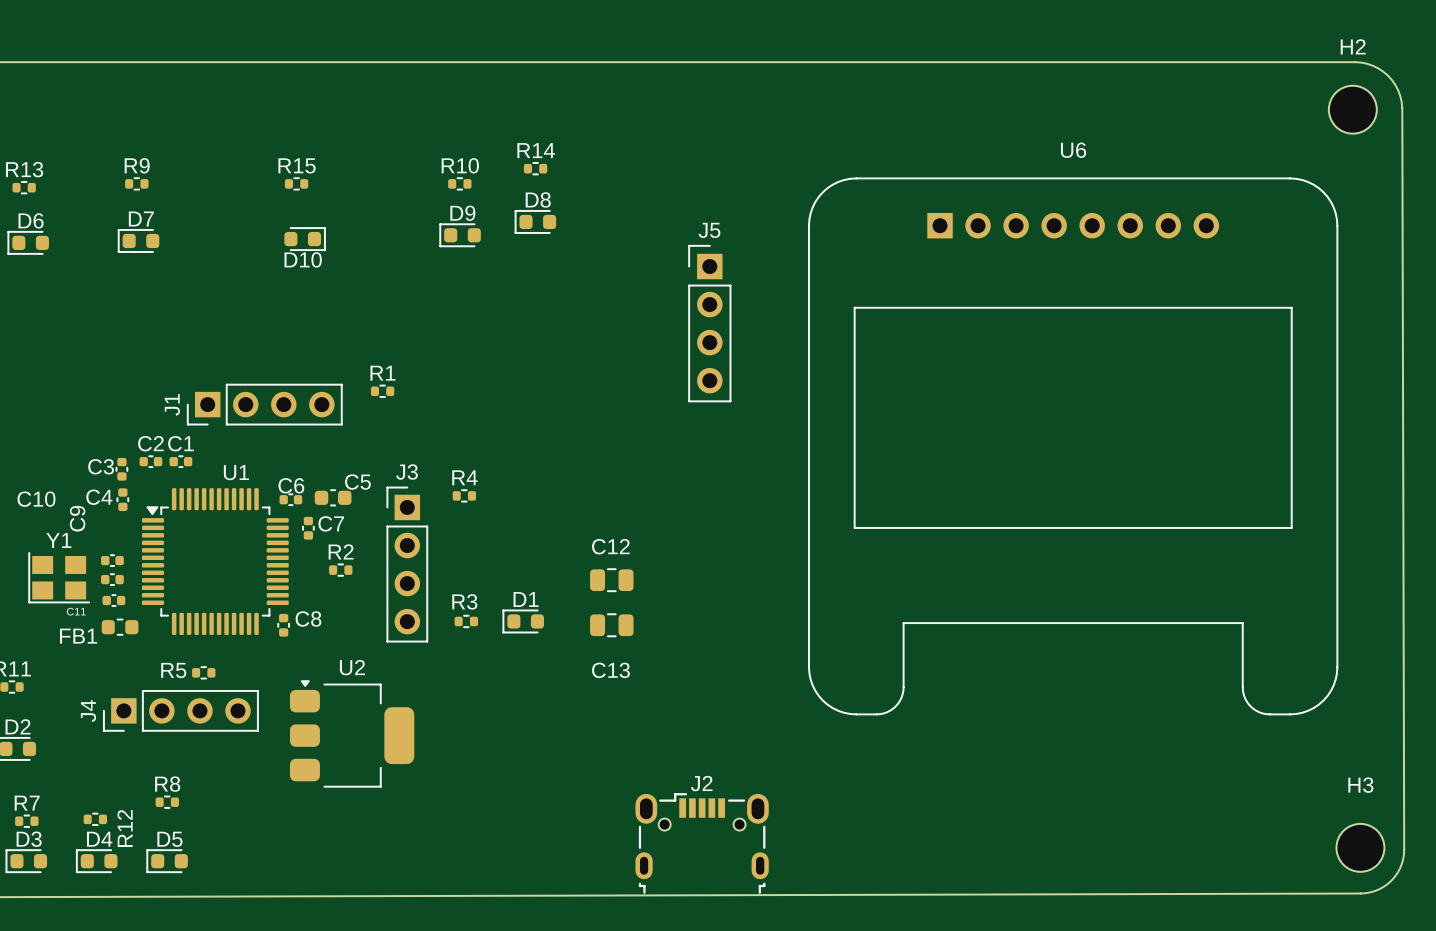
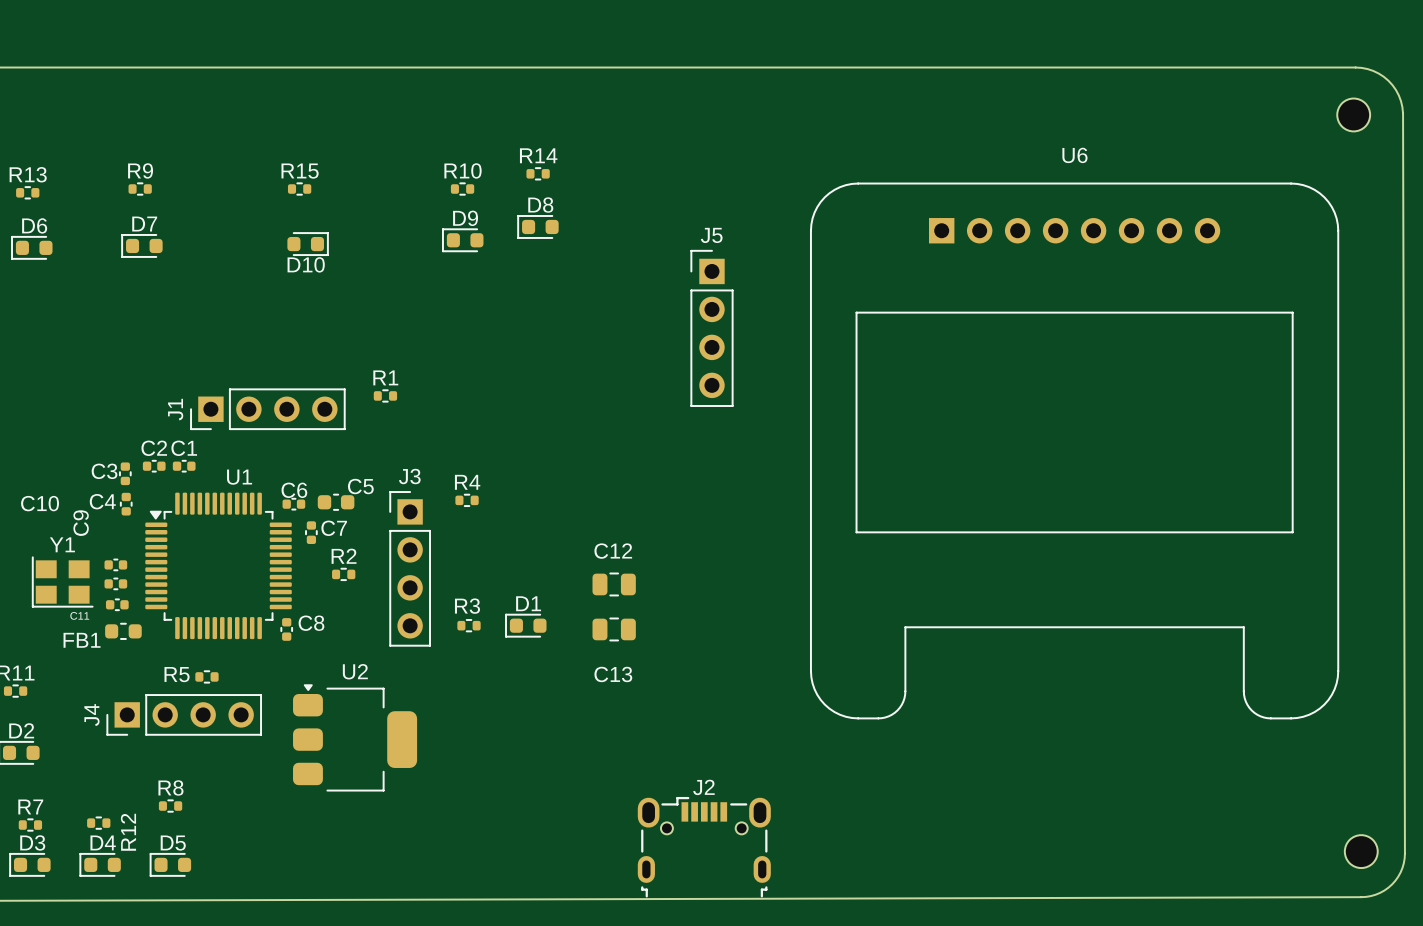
H2: (1352, 109) -> none
part: none -> (1353, 114)
H3: (1360, 847) -> none
part: none -> (1361, 851)

